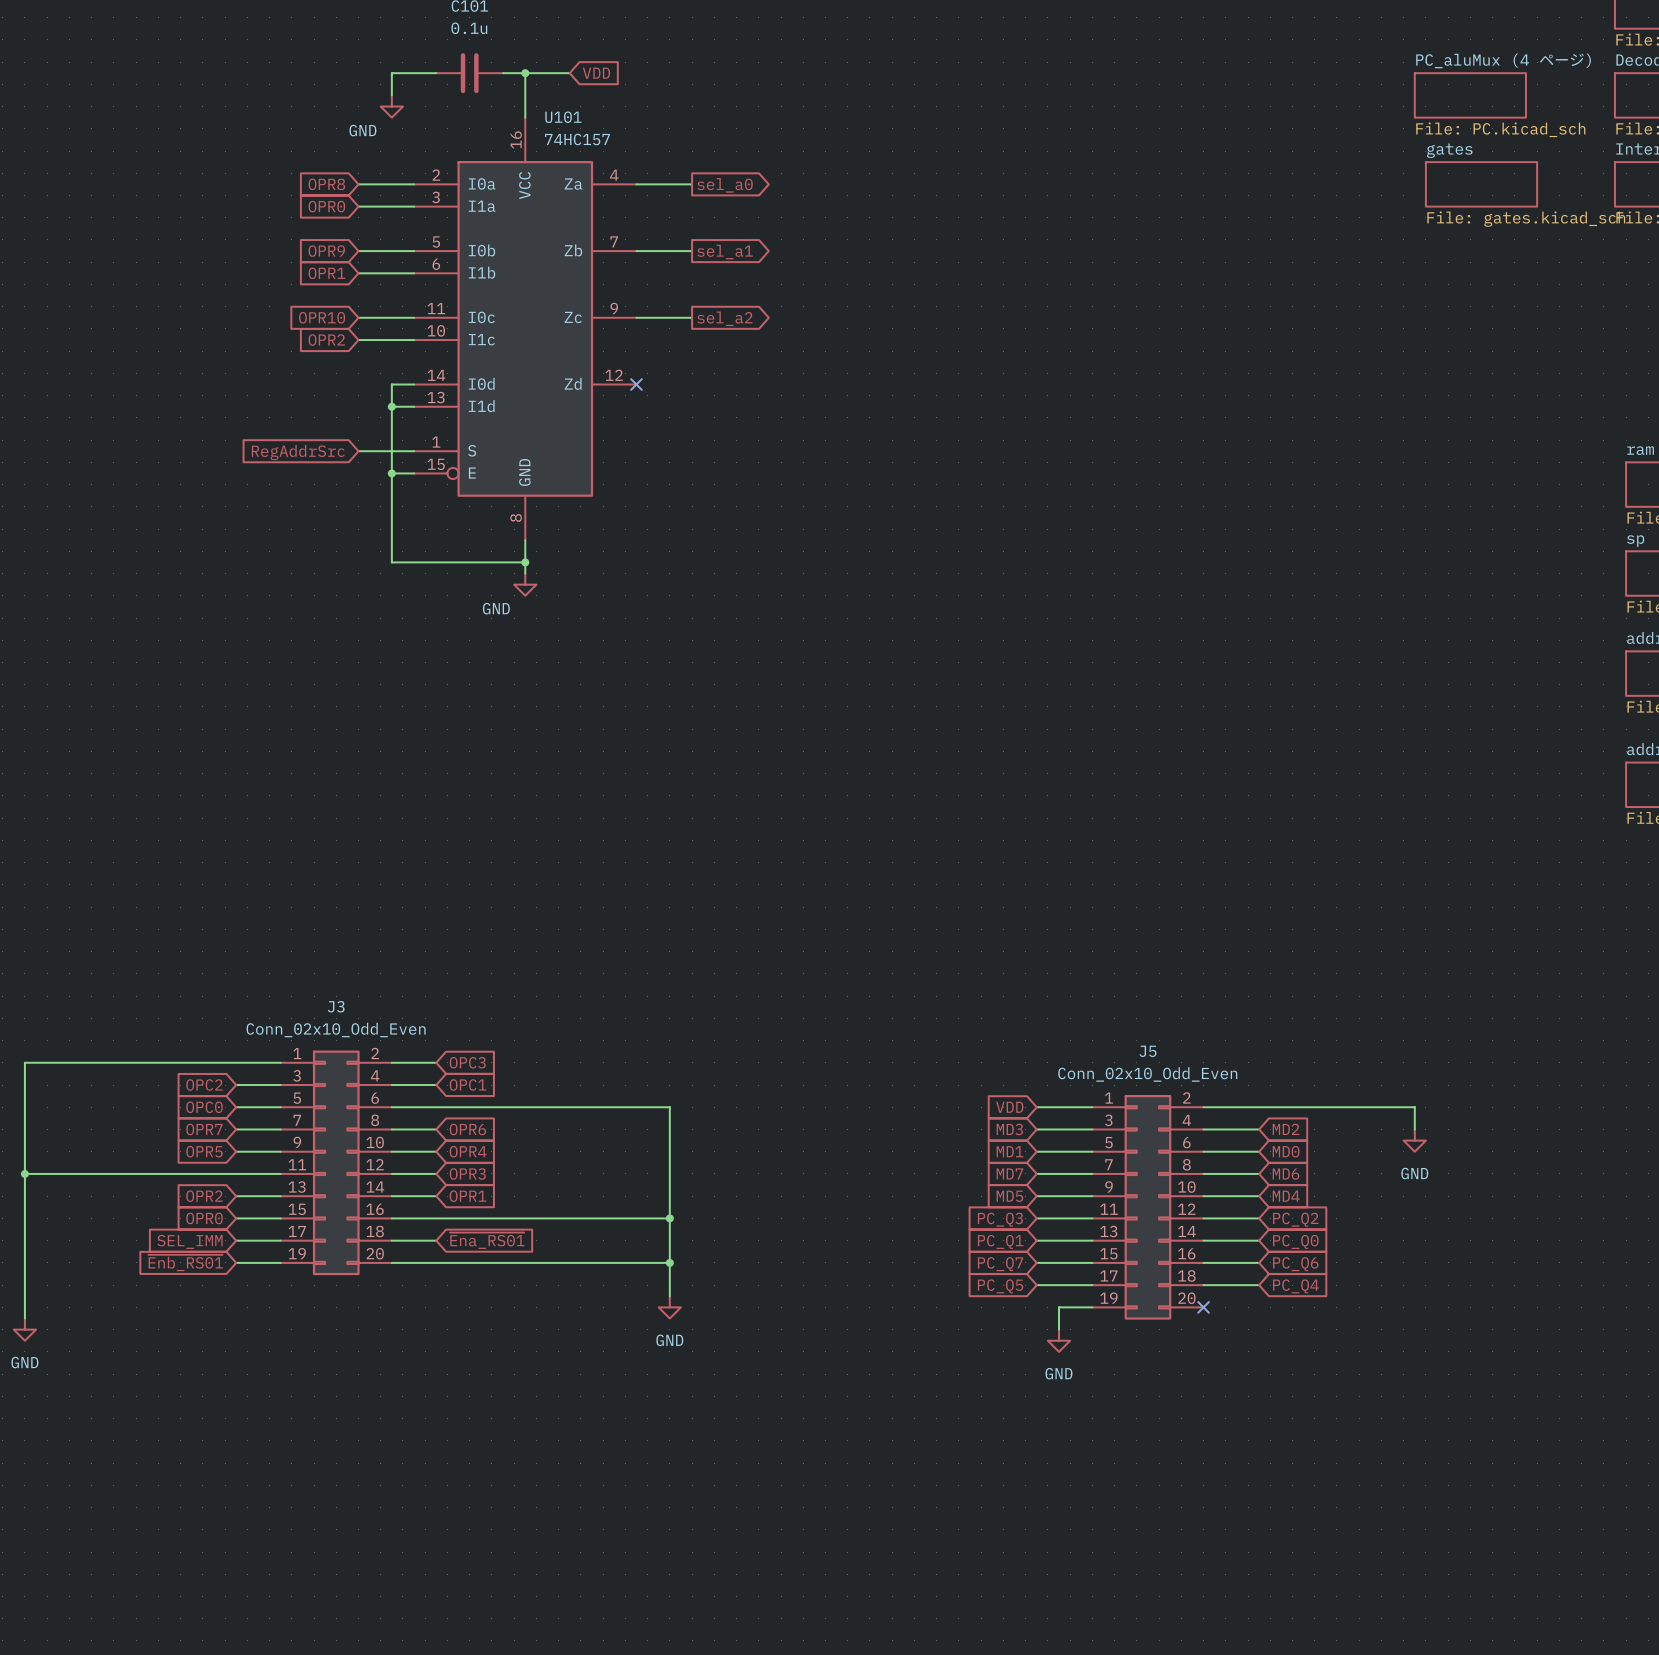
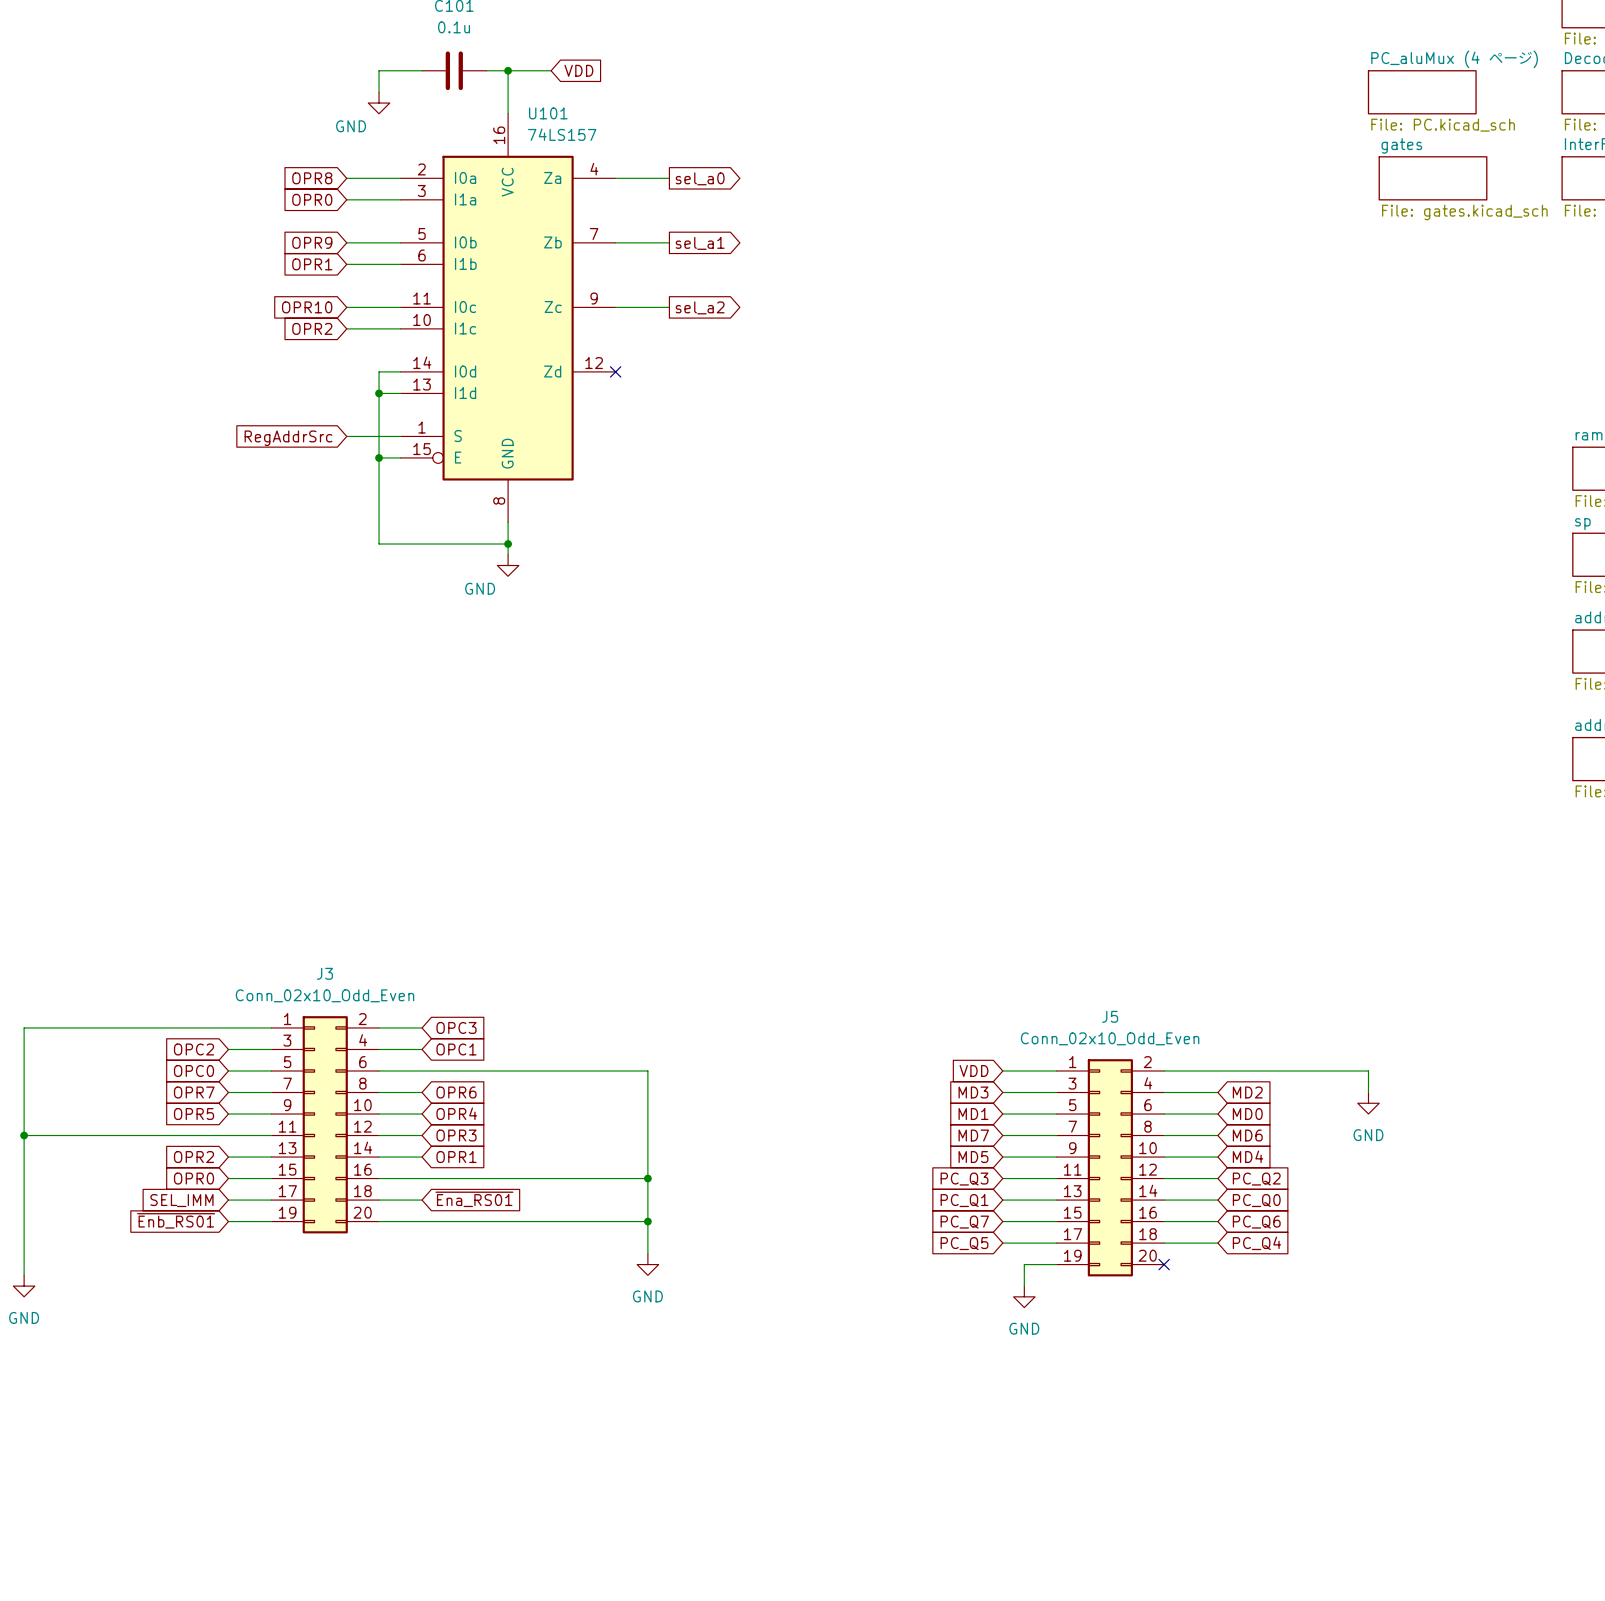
U101 value: 74HC157 (577, 139) -> 74LS157 (562, 134)

